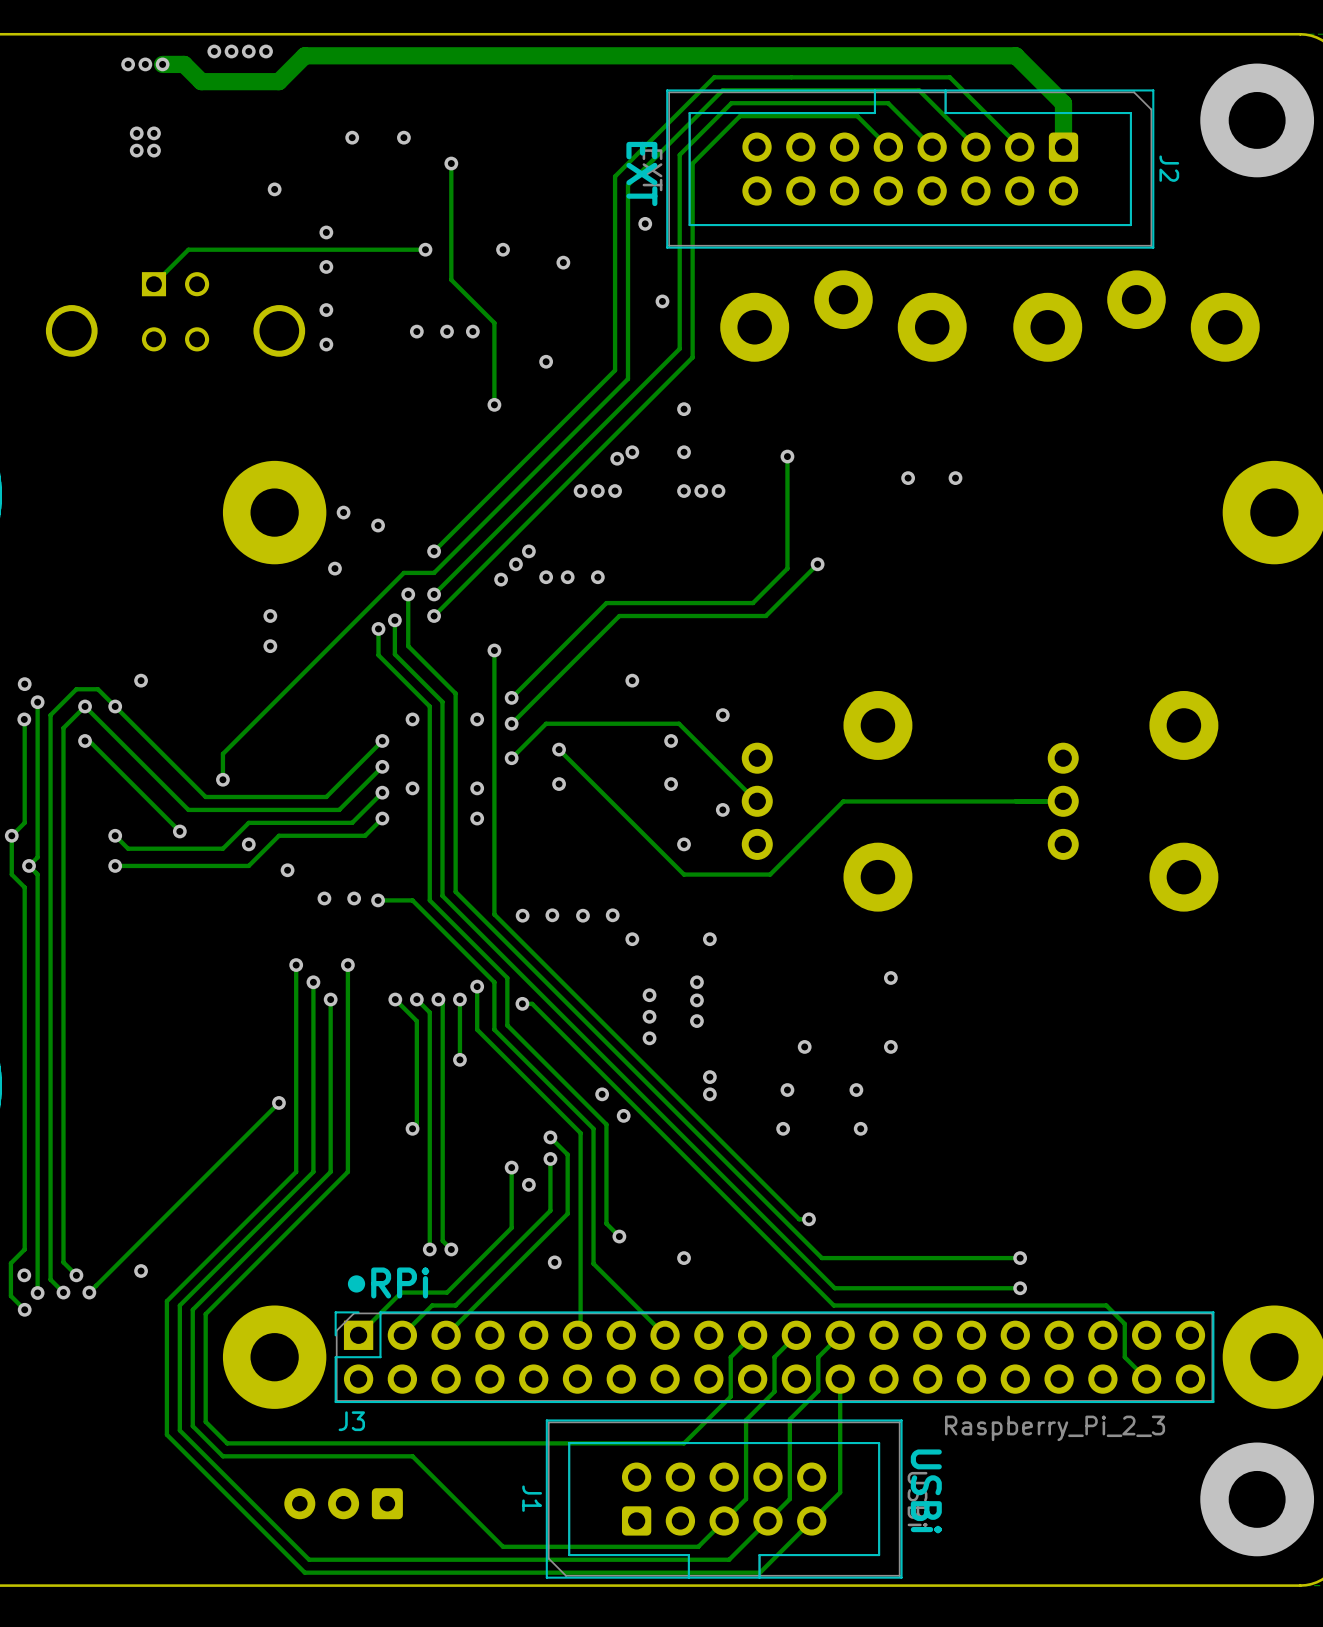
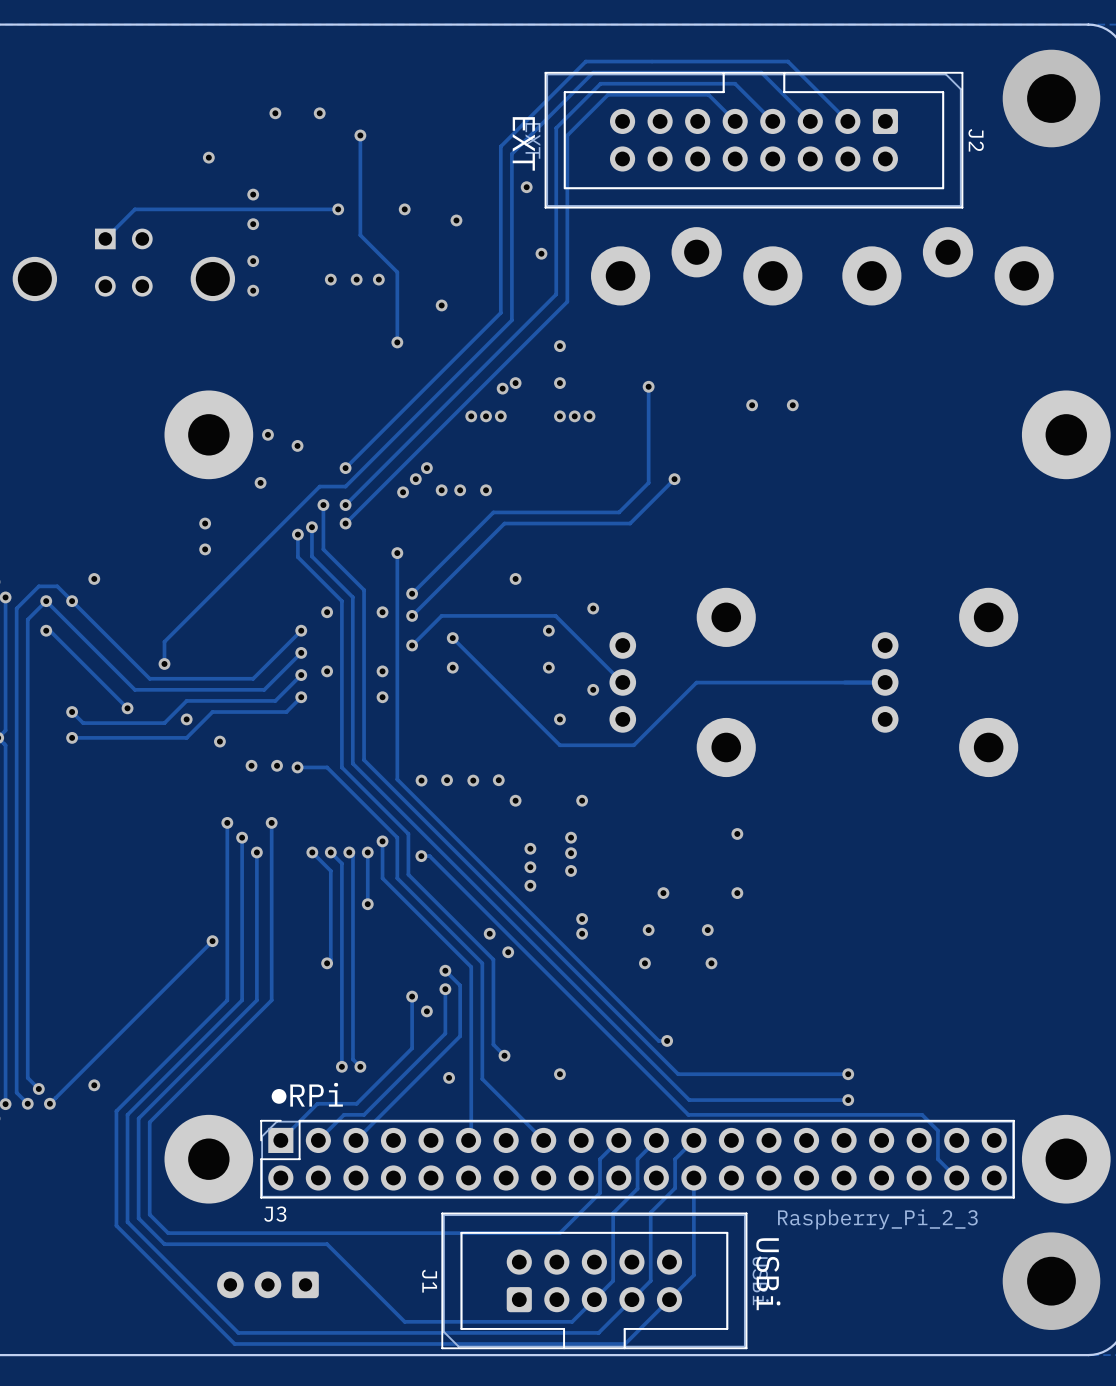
via: (214, 51) -> none
via: (231, 51) -> none
via: (248, 51) -> none
via: (266, 51) -> none
via: (128, 64) -> none
via: (145, 64) -> none
track: (162, 64) (184, 64) (201, 81) (278, 81) (304, 55) (1015, 55) (1063, 103) (1063, 147) -> none
via: (162, 64) -> none
via: (136, 133) -> none
via: (153, 133) -> none
via: (136, 150) -> none
via: (153, 150) -> none

